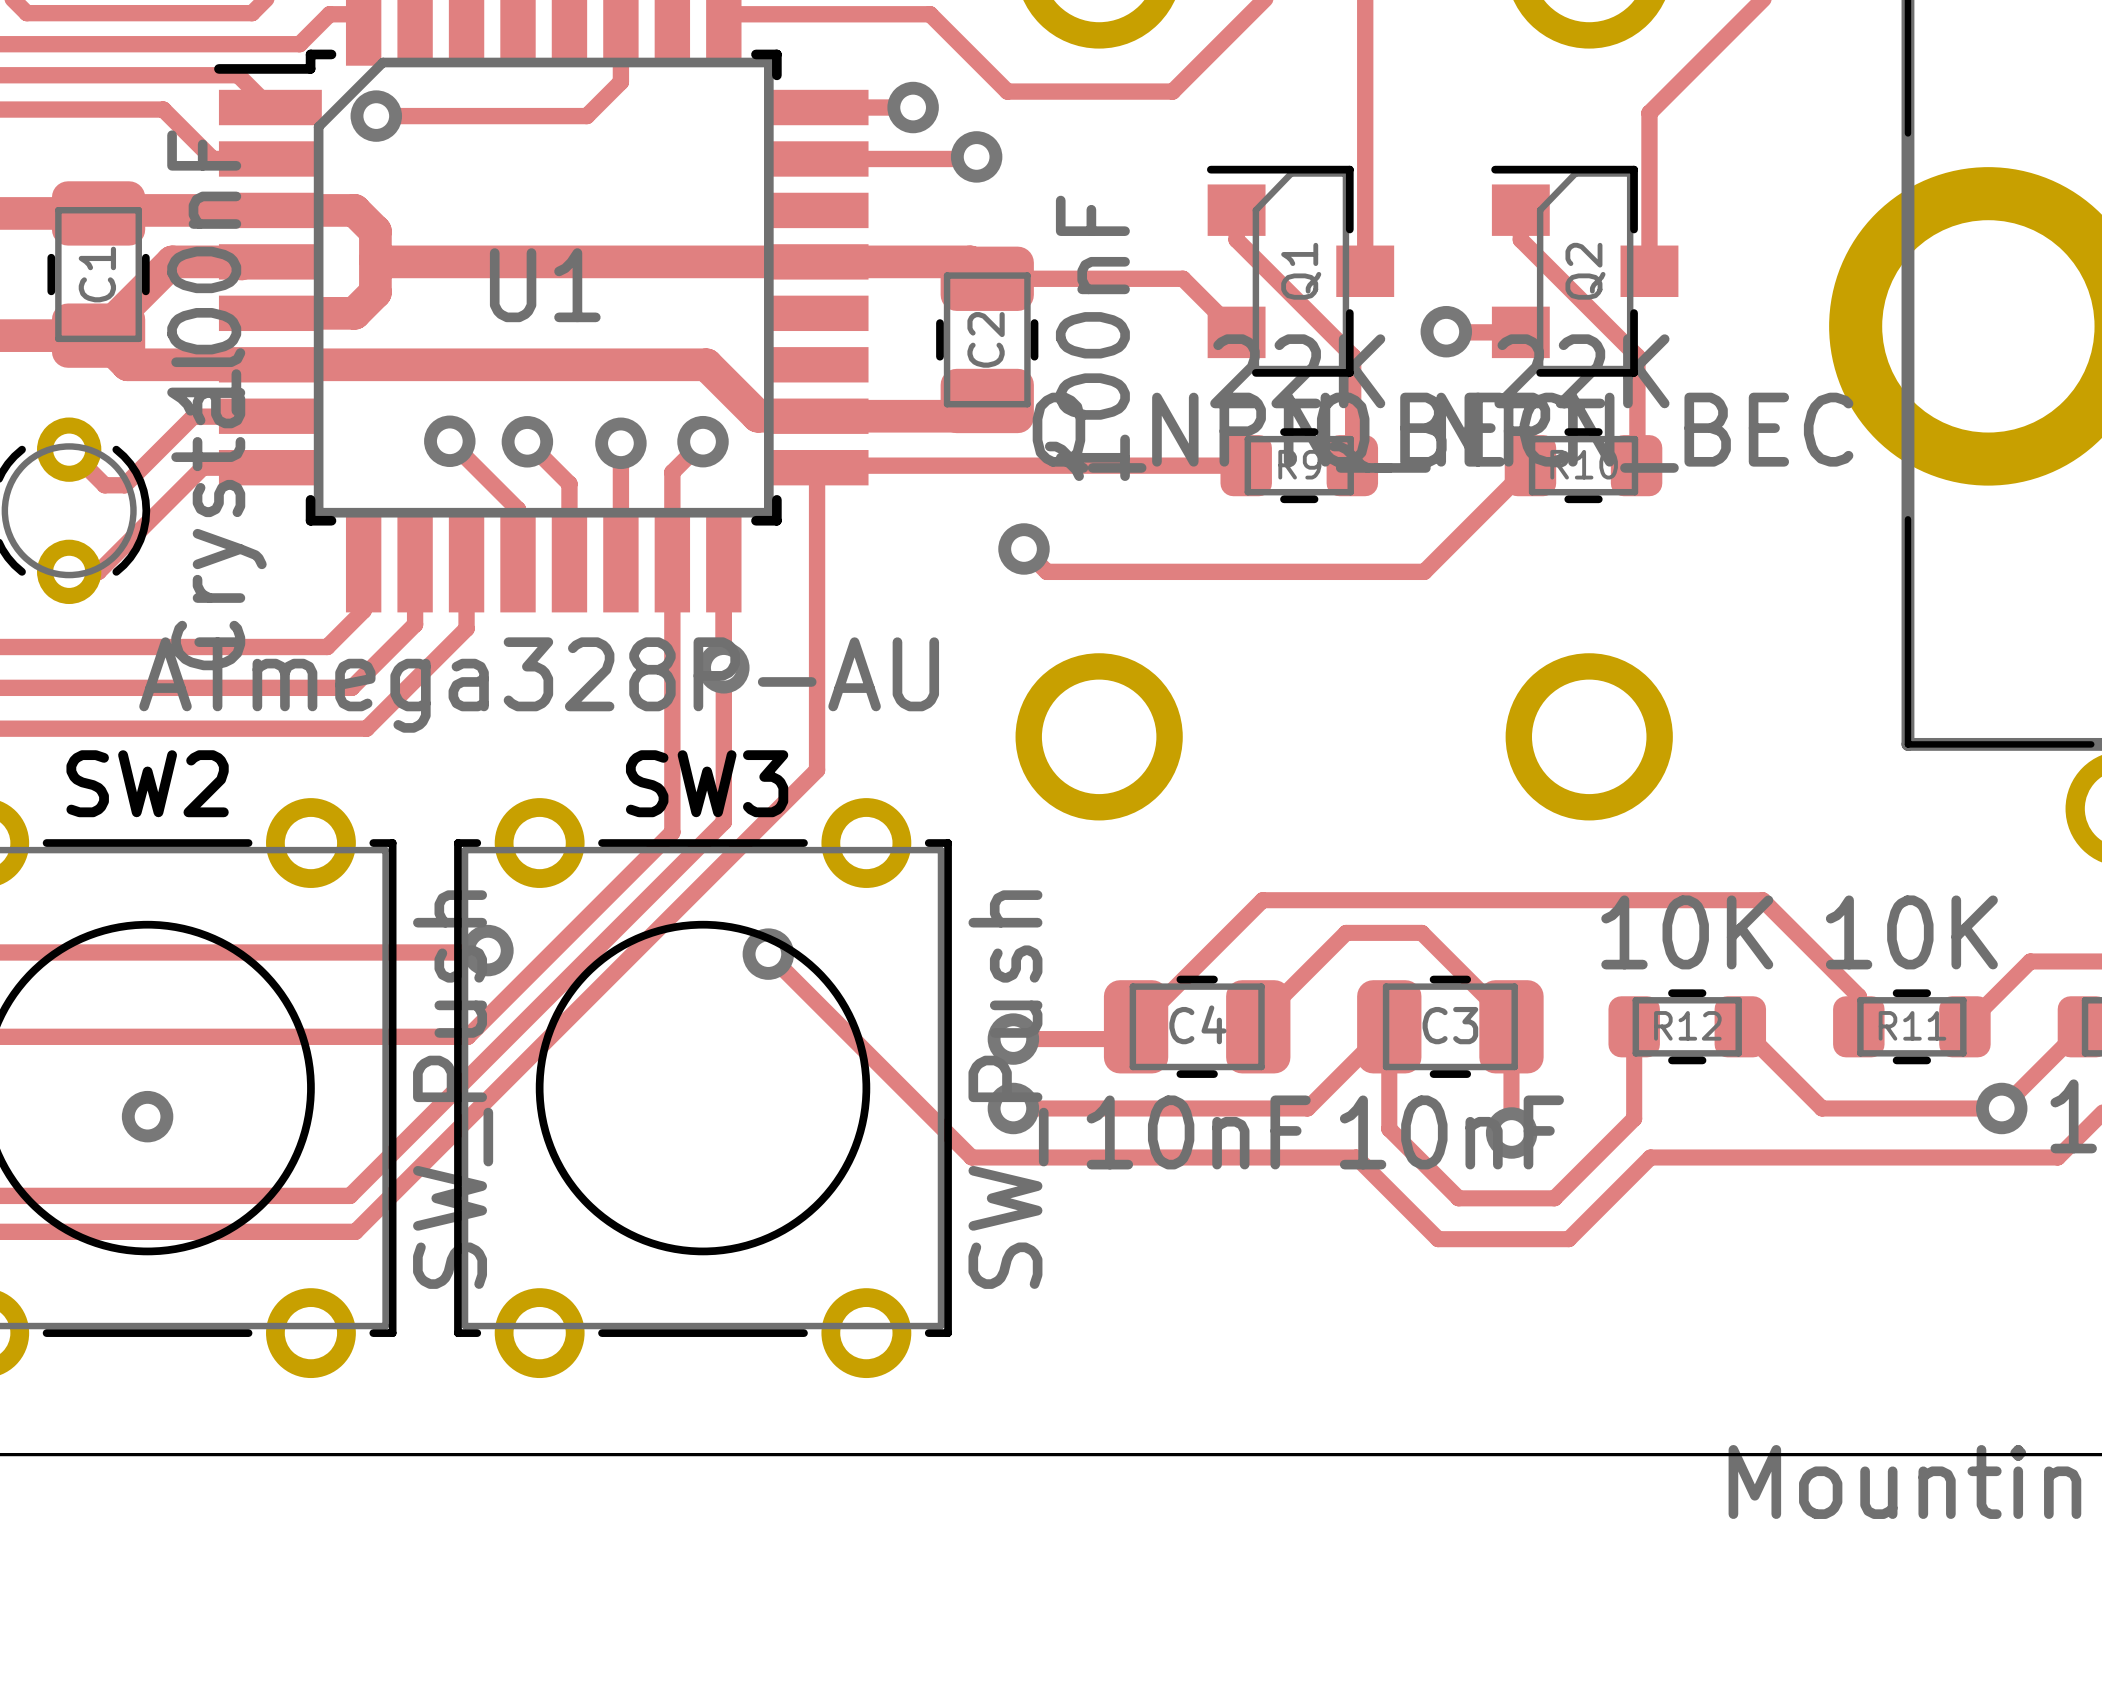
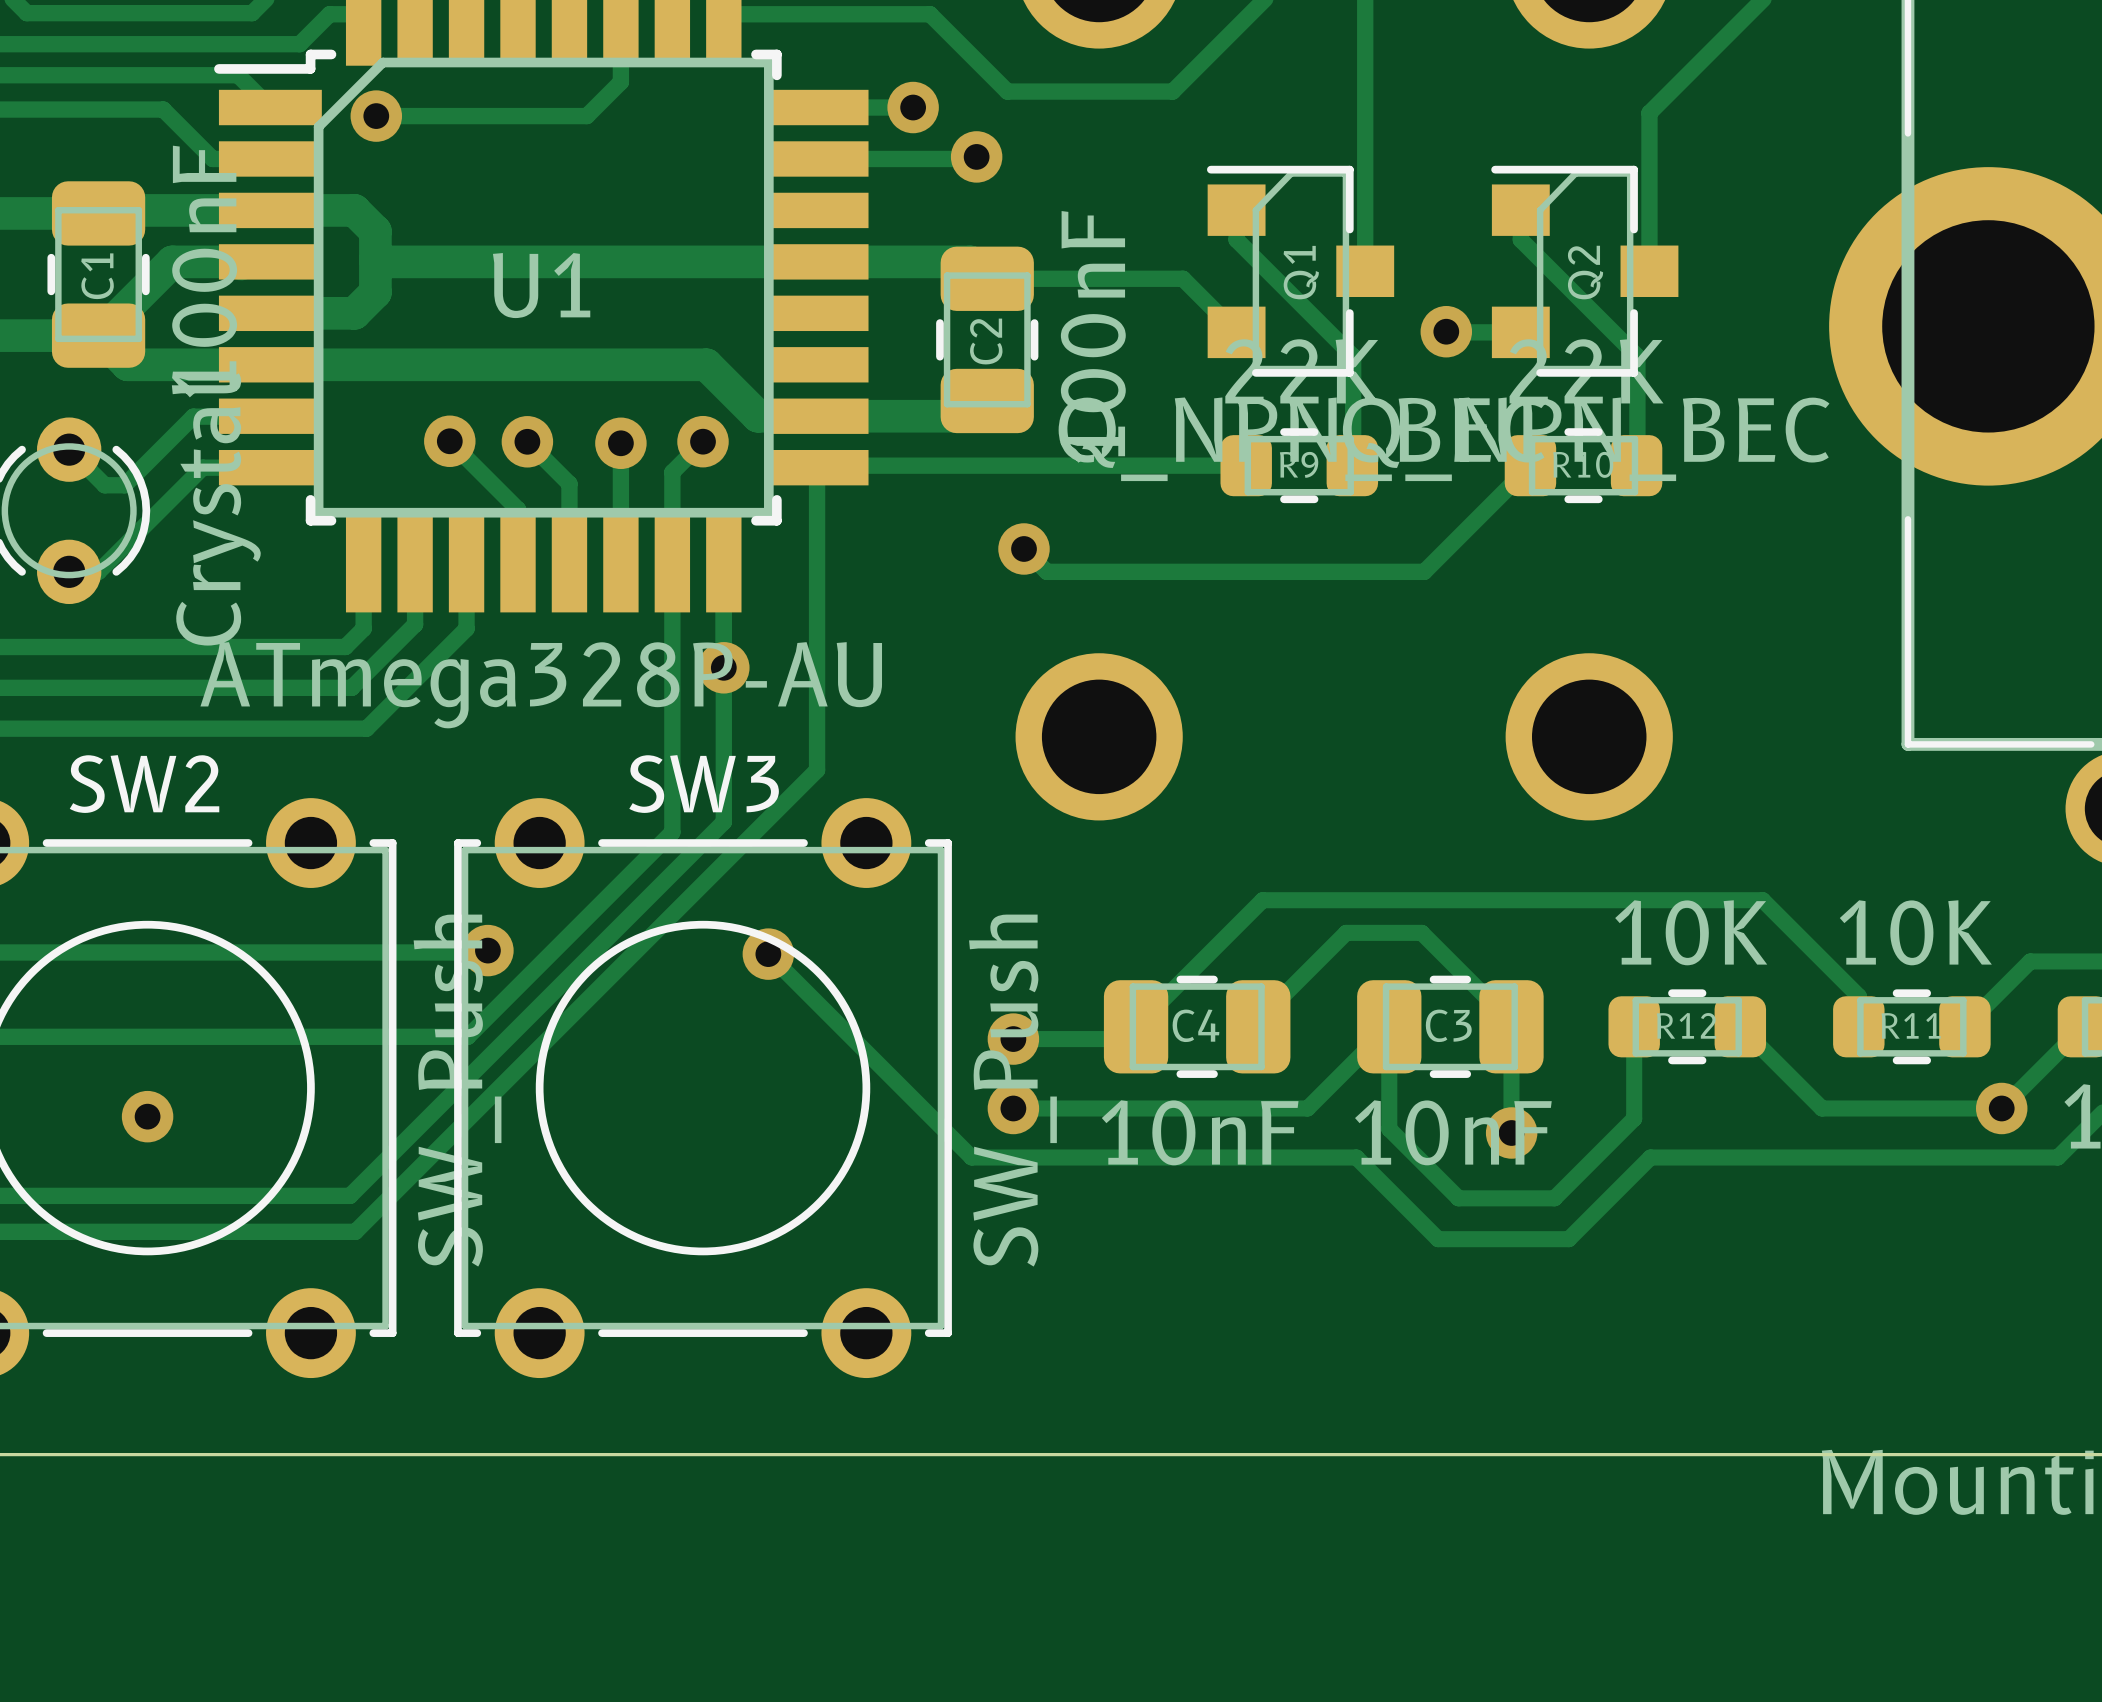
track: (363, 610) (327, 647) -> (363, 610) (363, 628) (345, 647) (327, 647)

